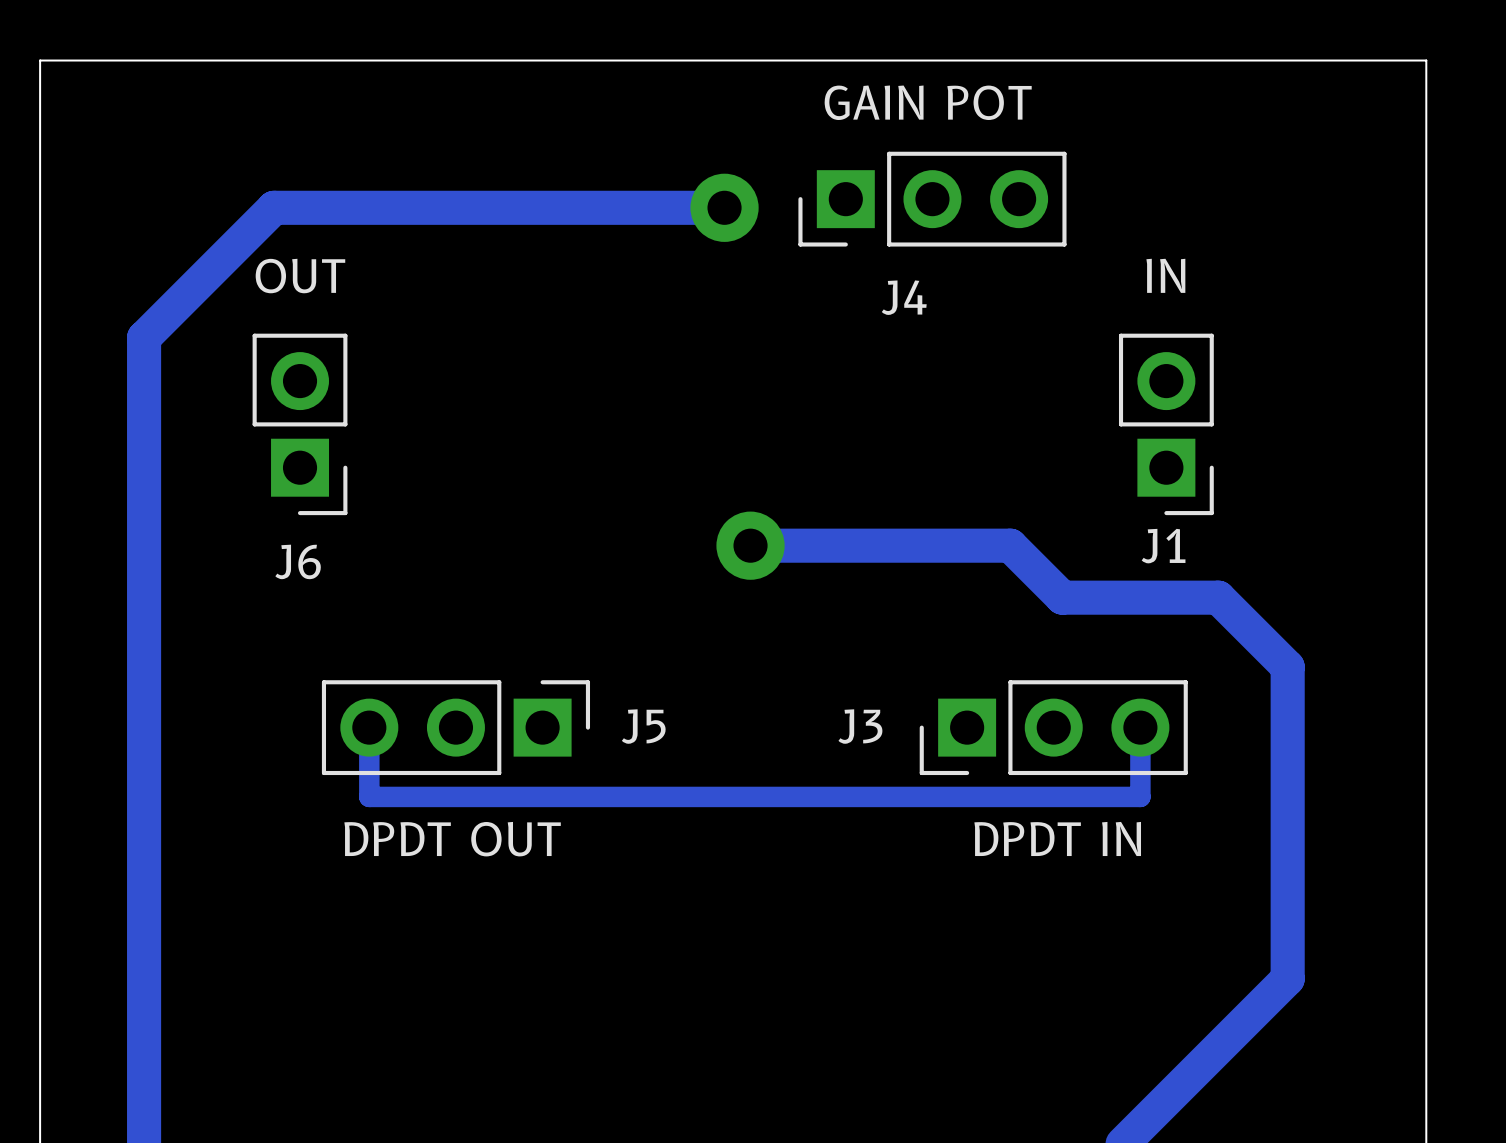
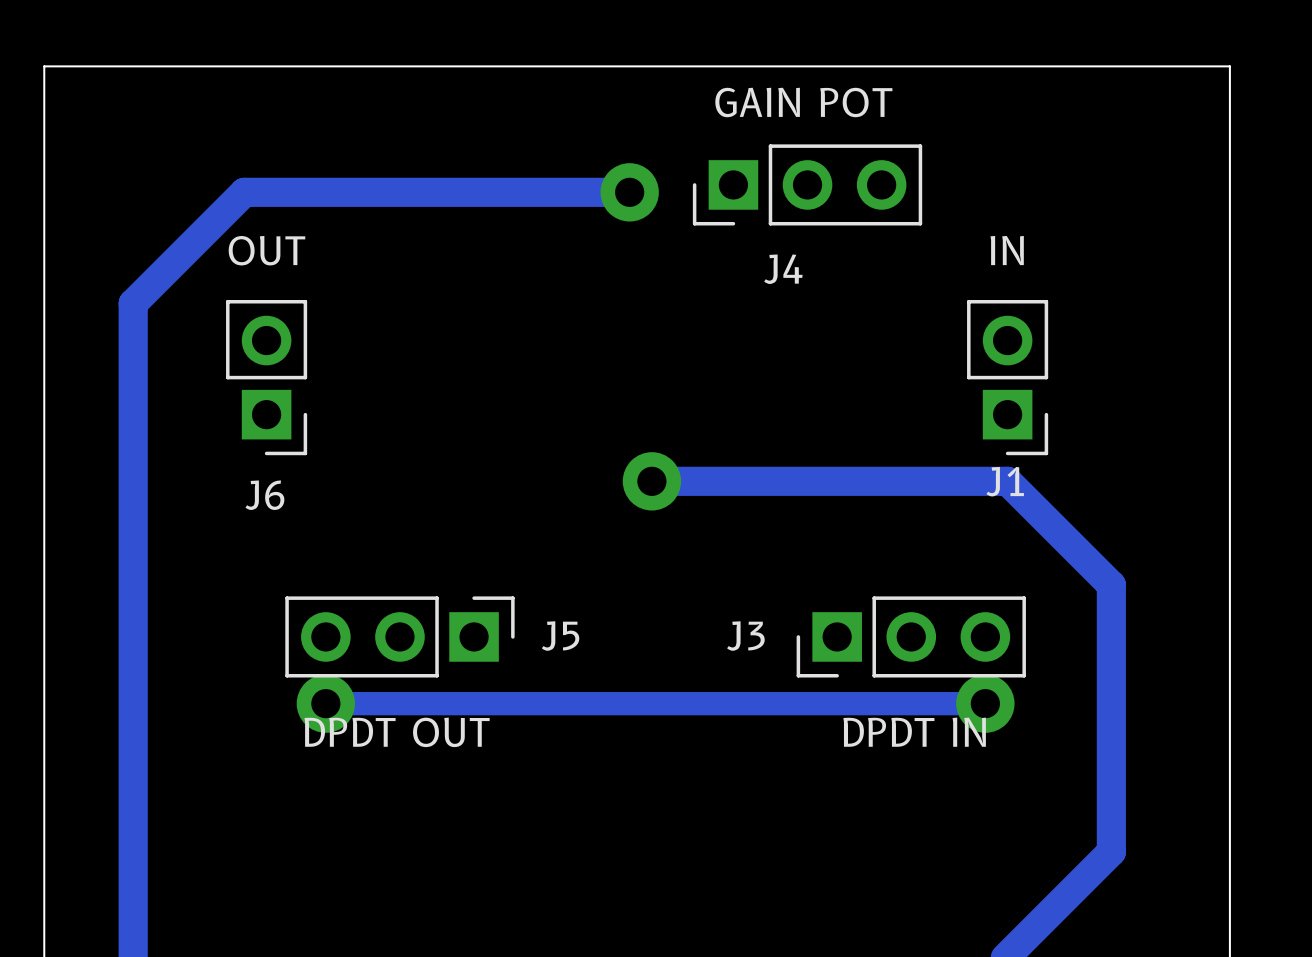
track: (1010, 545) (1062, 597) (1218, 597) -> (874, 481) (1007, 481) (1052, 525)
track: (1140, 727) (1140, 796) (369, 796) (369, 727) -> none
via: none -> (325, 703)
track: none -> (985, 703) (325, 703)
via: none -> (985, 703)

